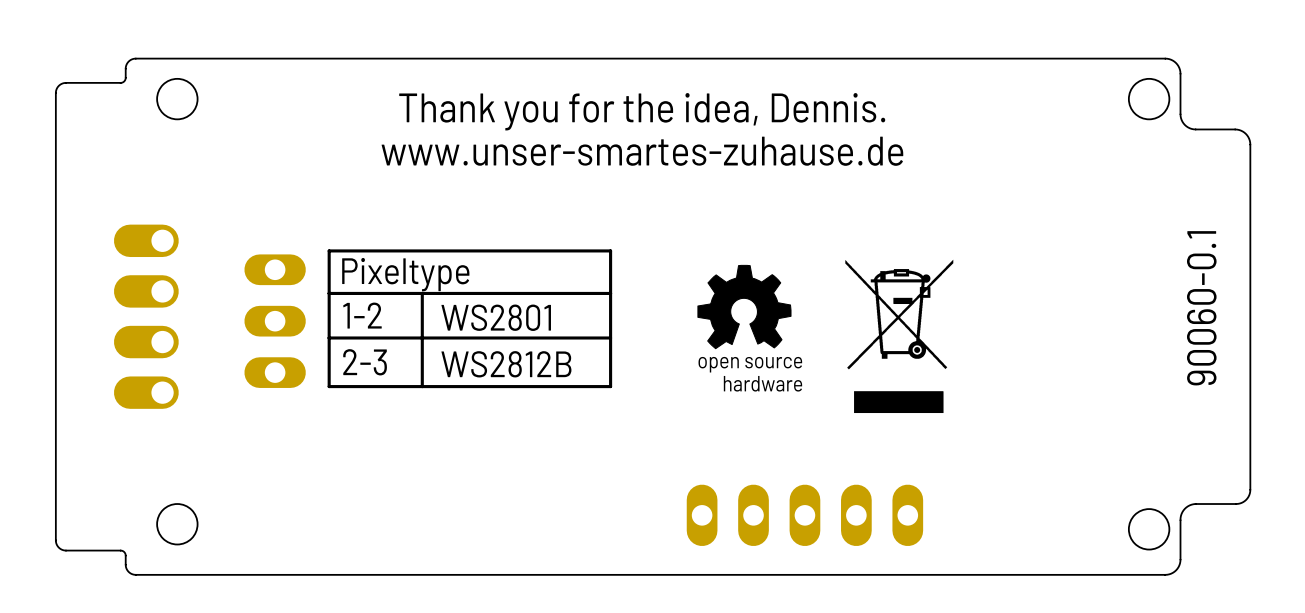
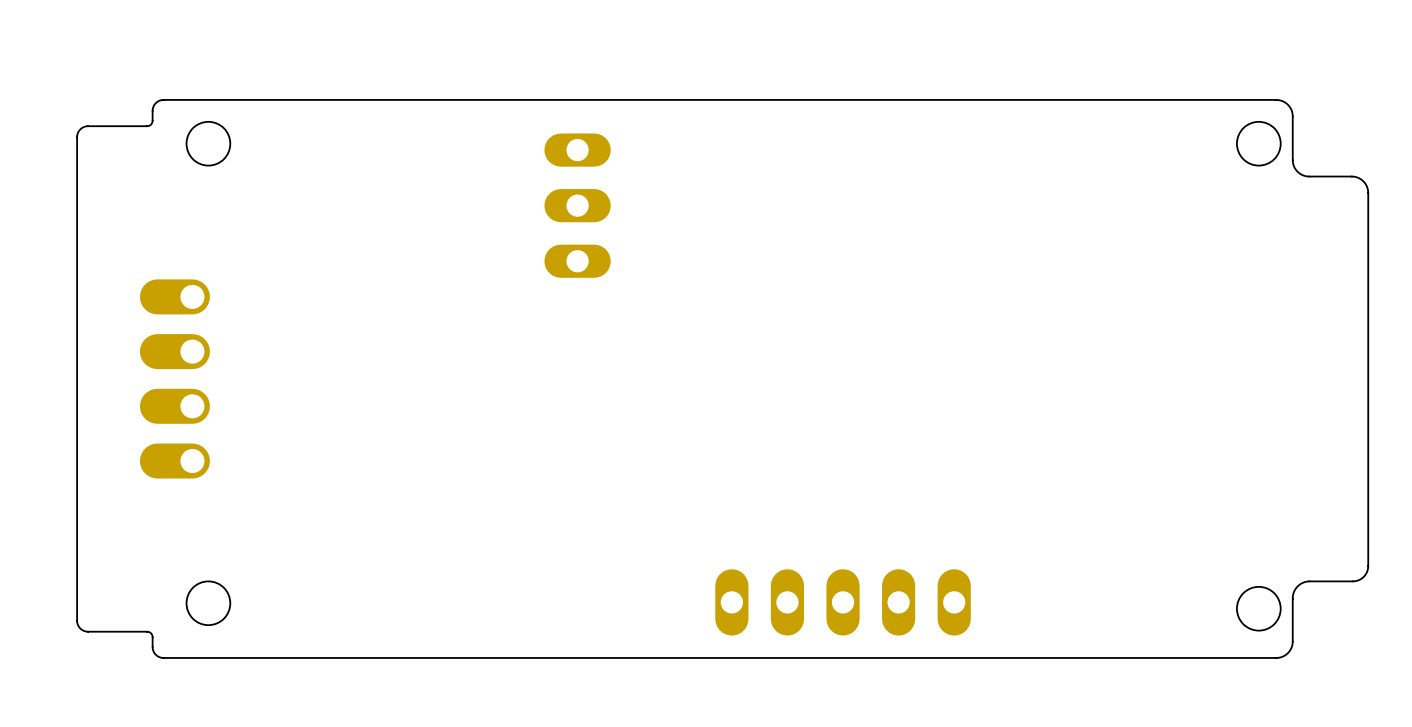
text: Thank you for the idea, Dennis. (642, 111) -> none
text: www.unser-smartes-zuhause.de (642, 151) -> none
line: (610, 250) (610, 386) (329, 386) (329, 250) (610, 250) -> none
drawing: [845, 259, 954, 414] -> none
drawing: [697, 264, 792, 350] -> none
text: Pixeltype (405, 274) -> none
line: (422, 293) (422, 386) -> none
line: (610, 293) (329, 293) -> none
text: 90060-0.1 (1201, 308) -> none
text: 1-2 (362, 315) -> none
text: WS2801 (496, 317) -> none
part position: (275, 321) -> (577, 205)
line: (610, 337) (329, 337) -> none
text: 2-3 (365, 362) -> none
text: WS2812B (506, 364) -> none
part position: (804, 515) -> (843, 602)

